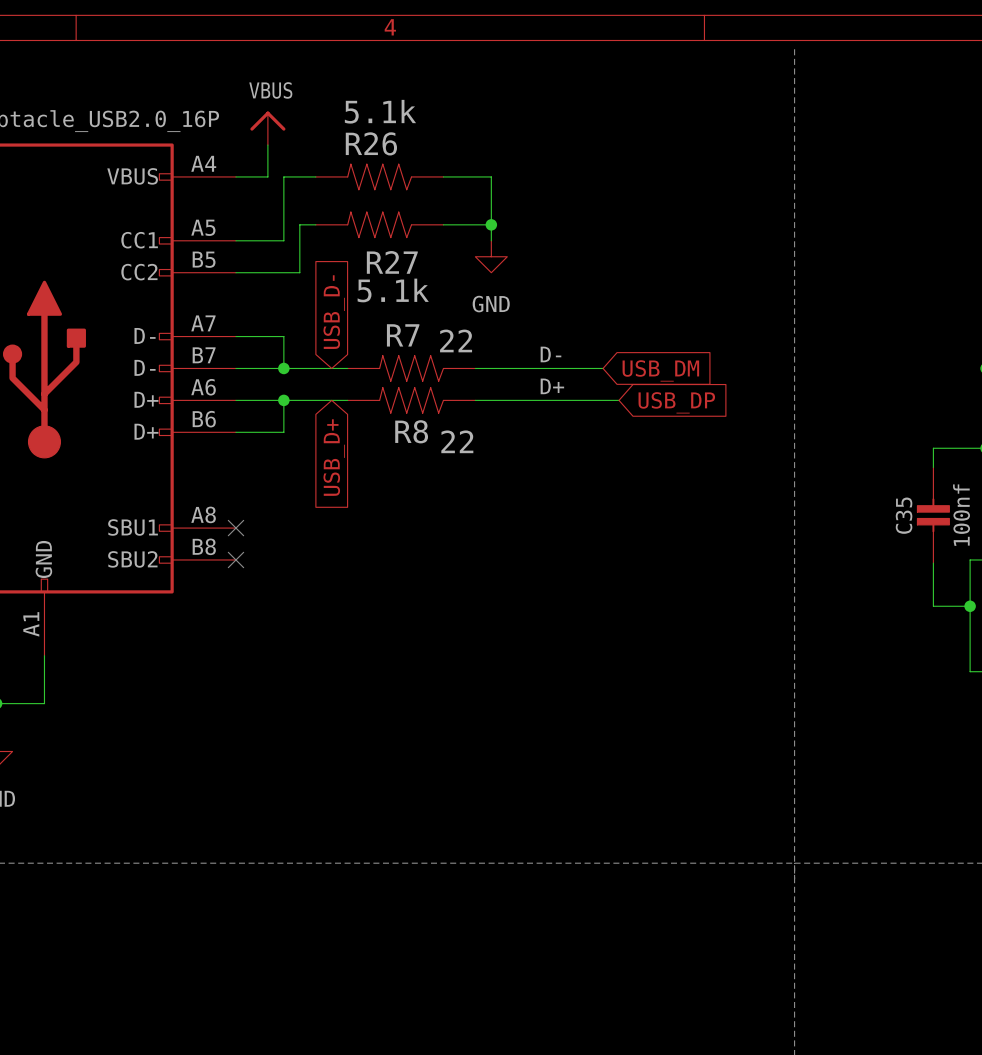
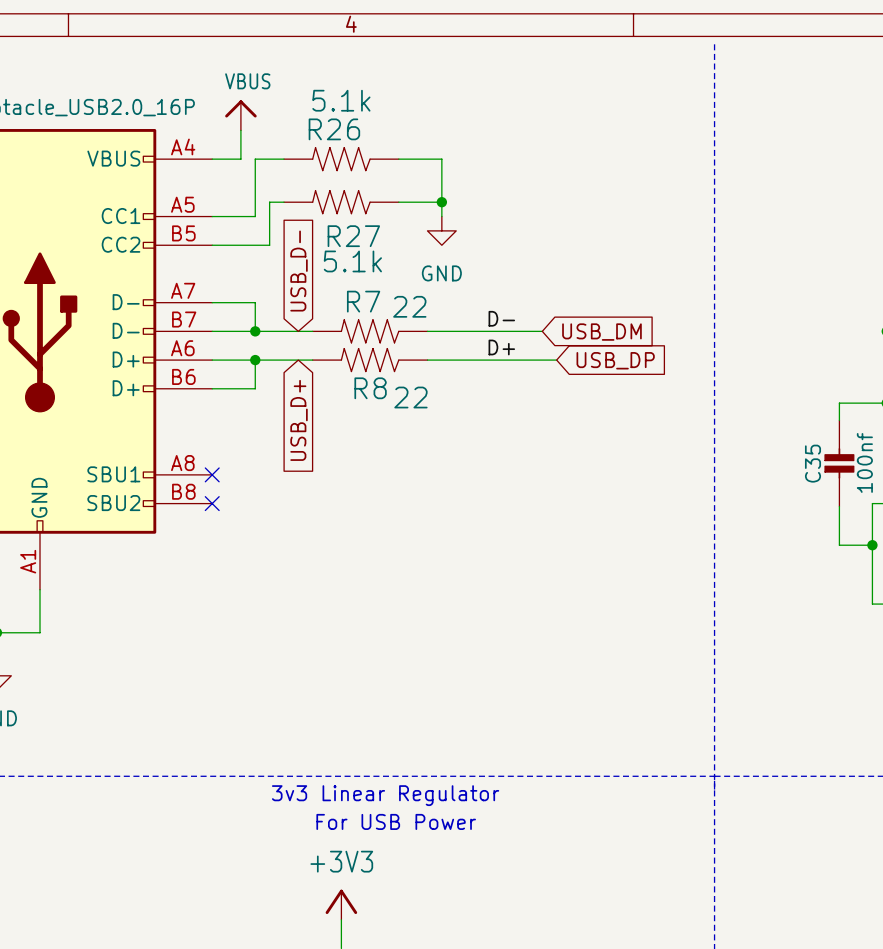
text: none -> 3v3 Linear Regulator (385, 795)
text: none -> For USB Power (396, 821)
power symbol: none -> +3V3 (341, 904)
wire: none -> (341, 919) (341, 948)

